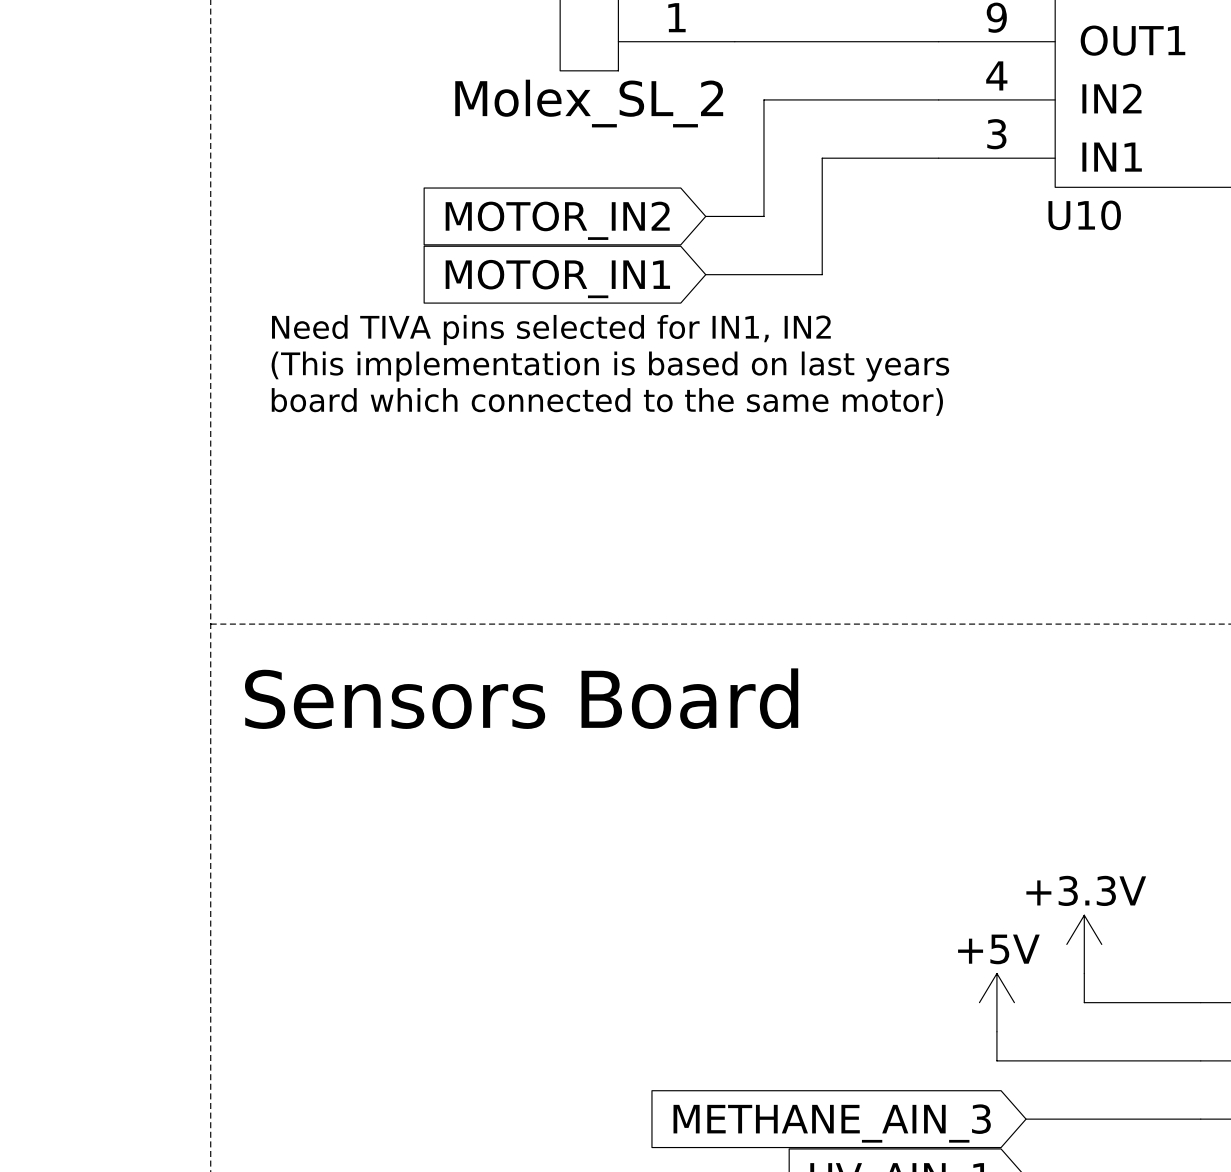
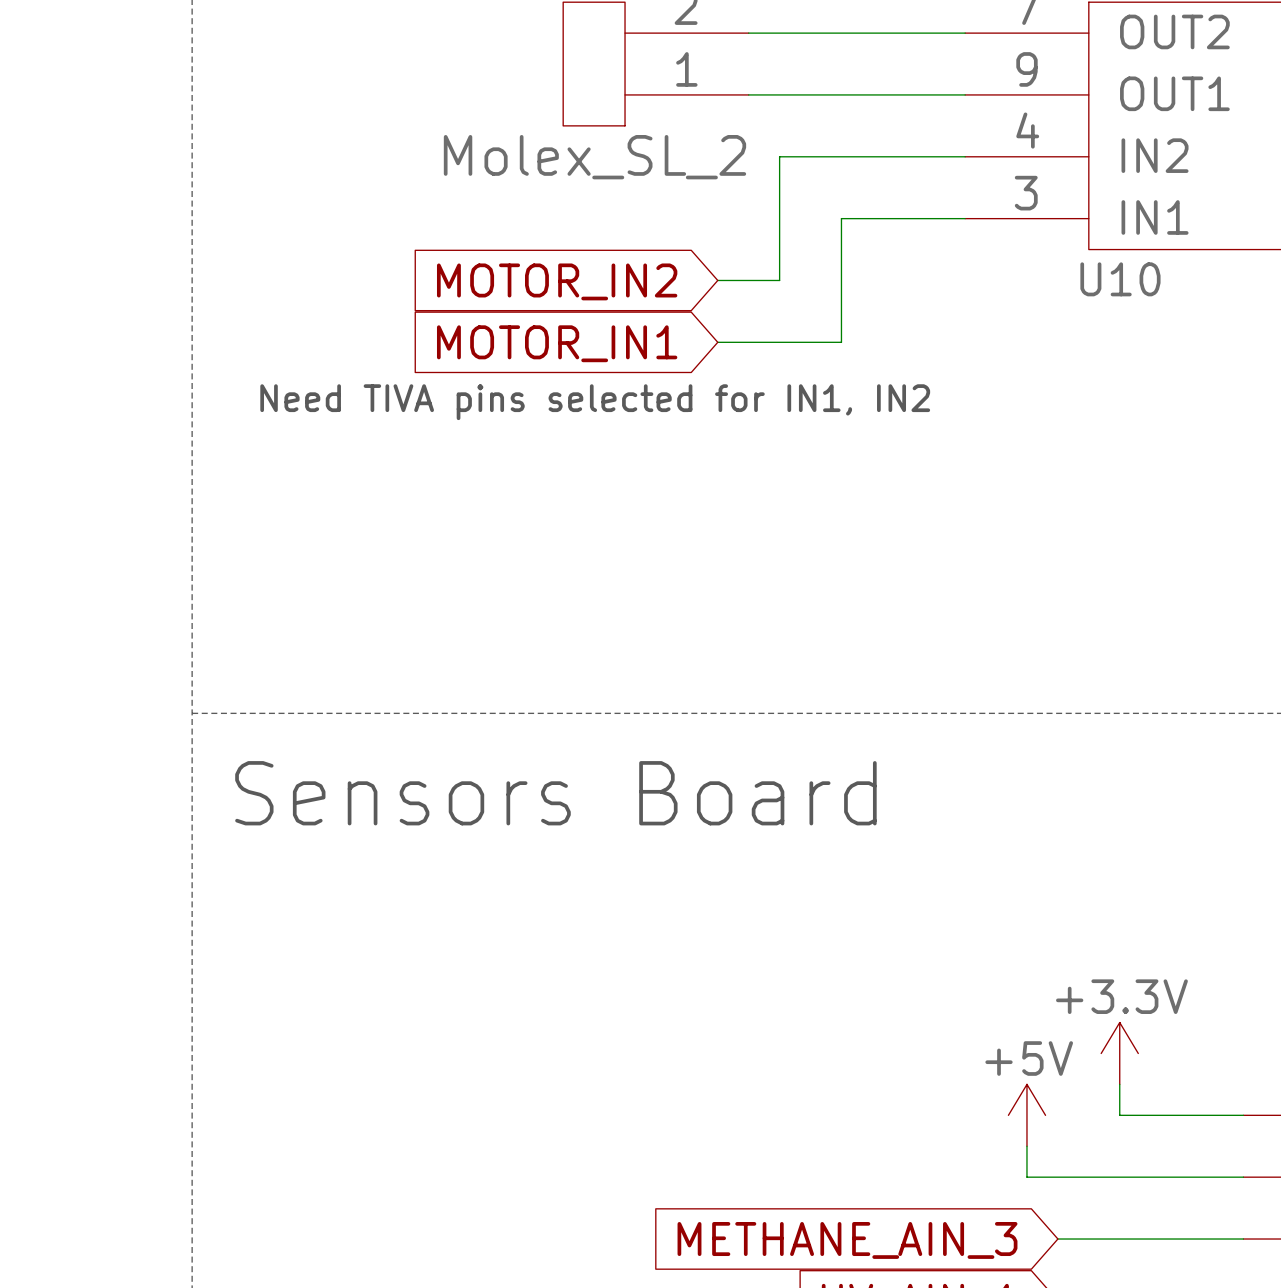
text: (This implementation is based on last years (610, 366) -> none
text: board which connected to the same motor) (607, 401) -> none

